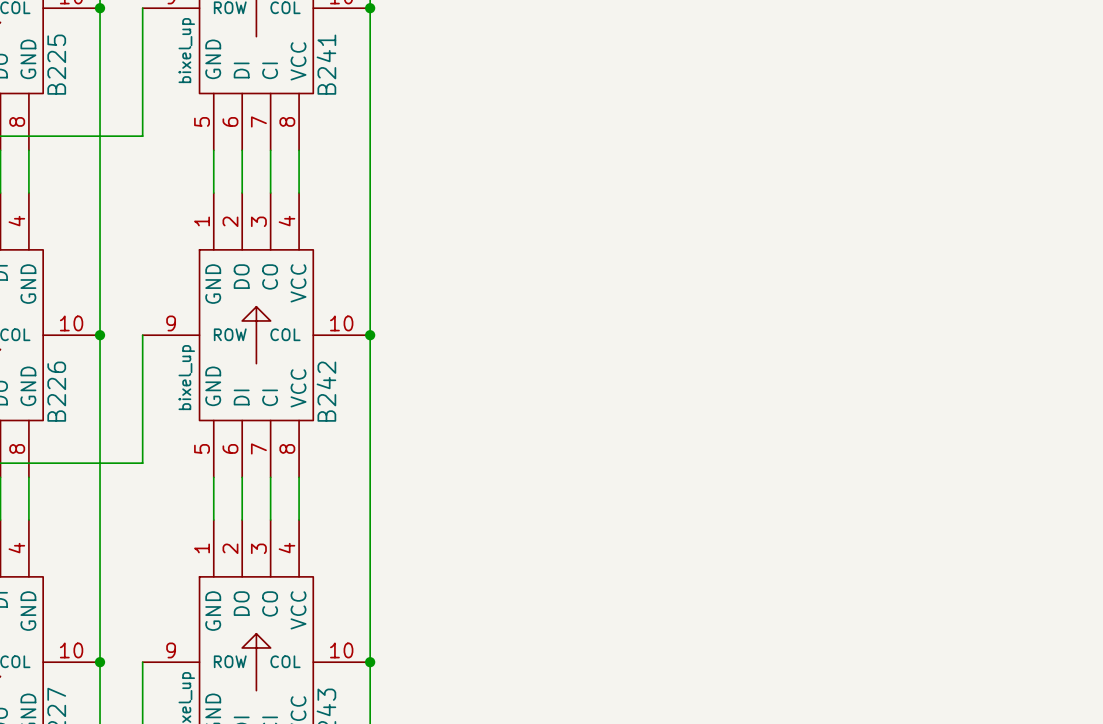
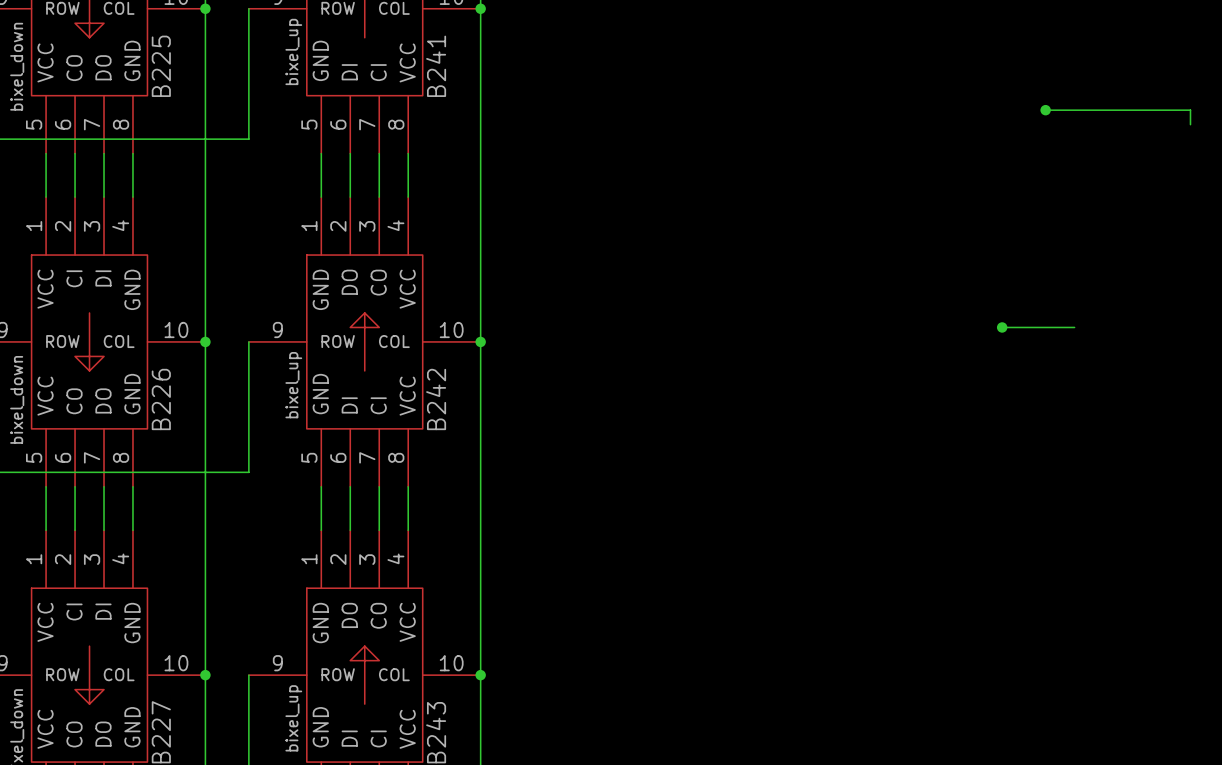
wire: none -> (1045, 110) (1190, 110) (1190, 124)
junction: none -> (1045, 110)
wire: none -> (1002, 327) (1074, 327)
junction: none -> (1002, 327)

